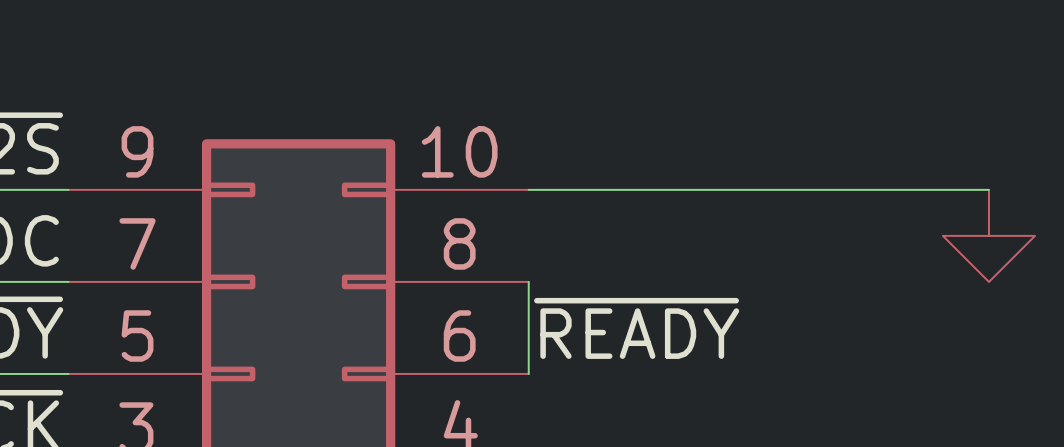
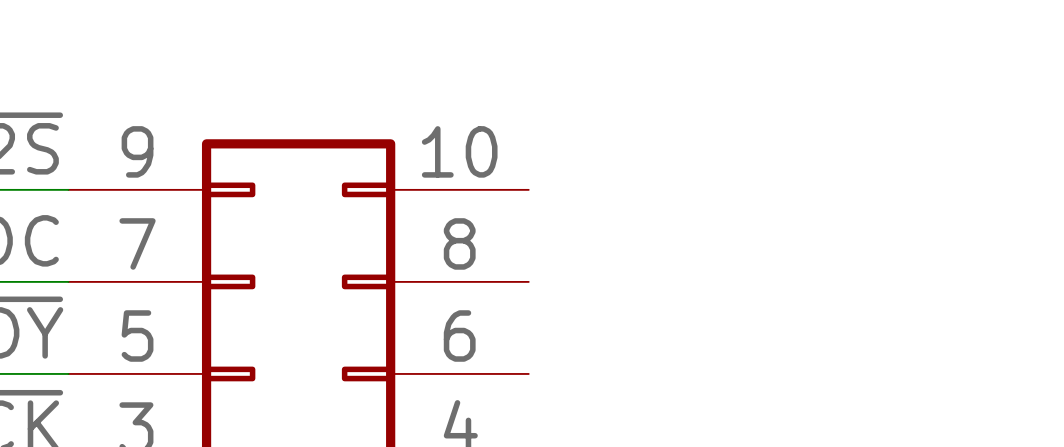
wire: (528, 189) (988, 189) -> none
power symbol: (988, 235) -> none
wire: (528, 281) (528, 373) -> none
label: ~{READY} (636, 328) -> none

